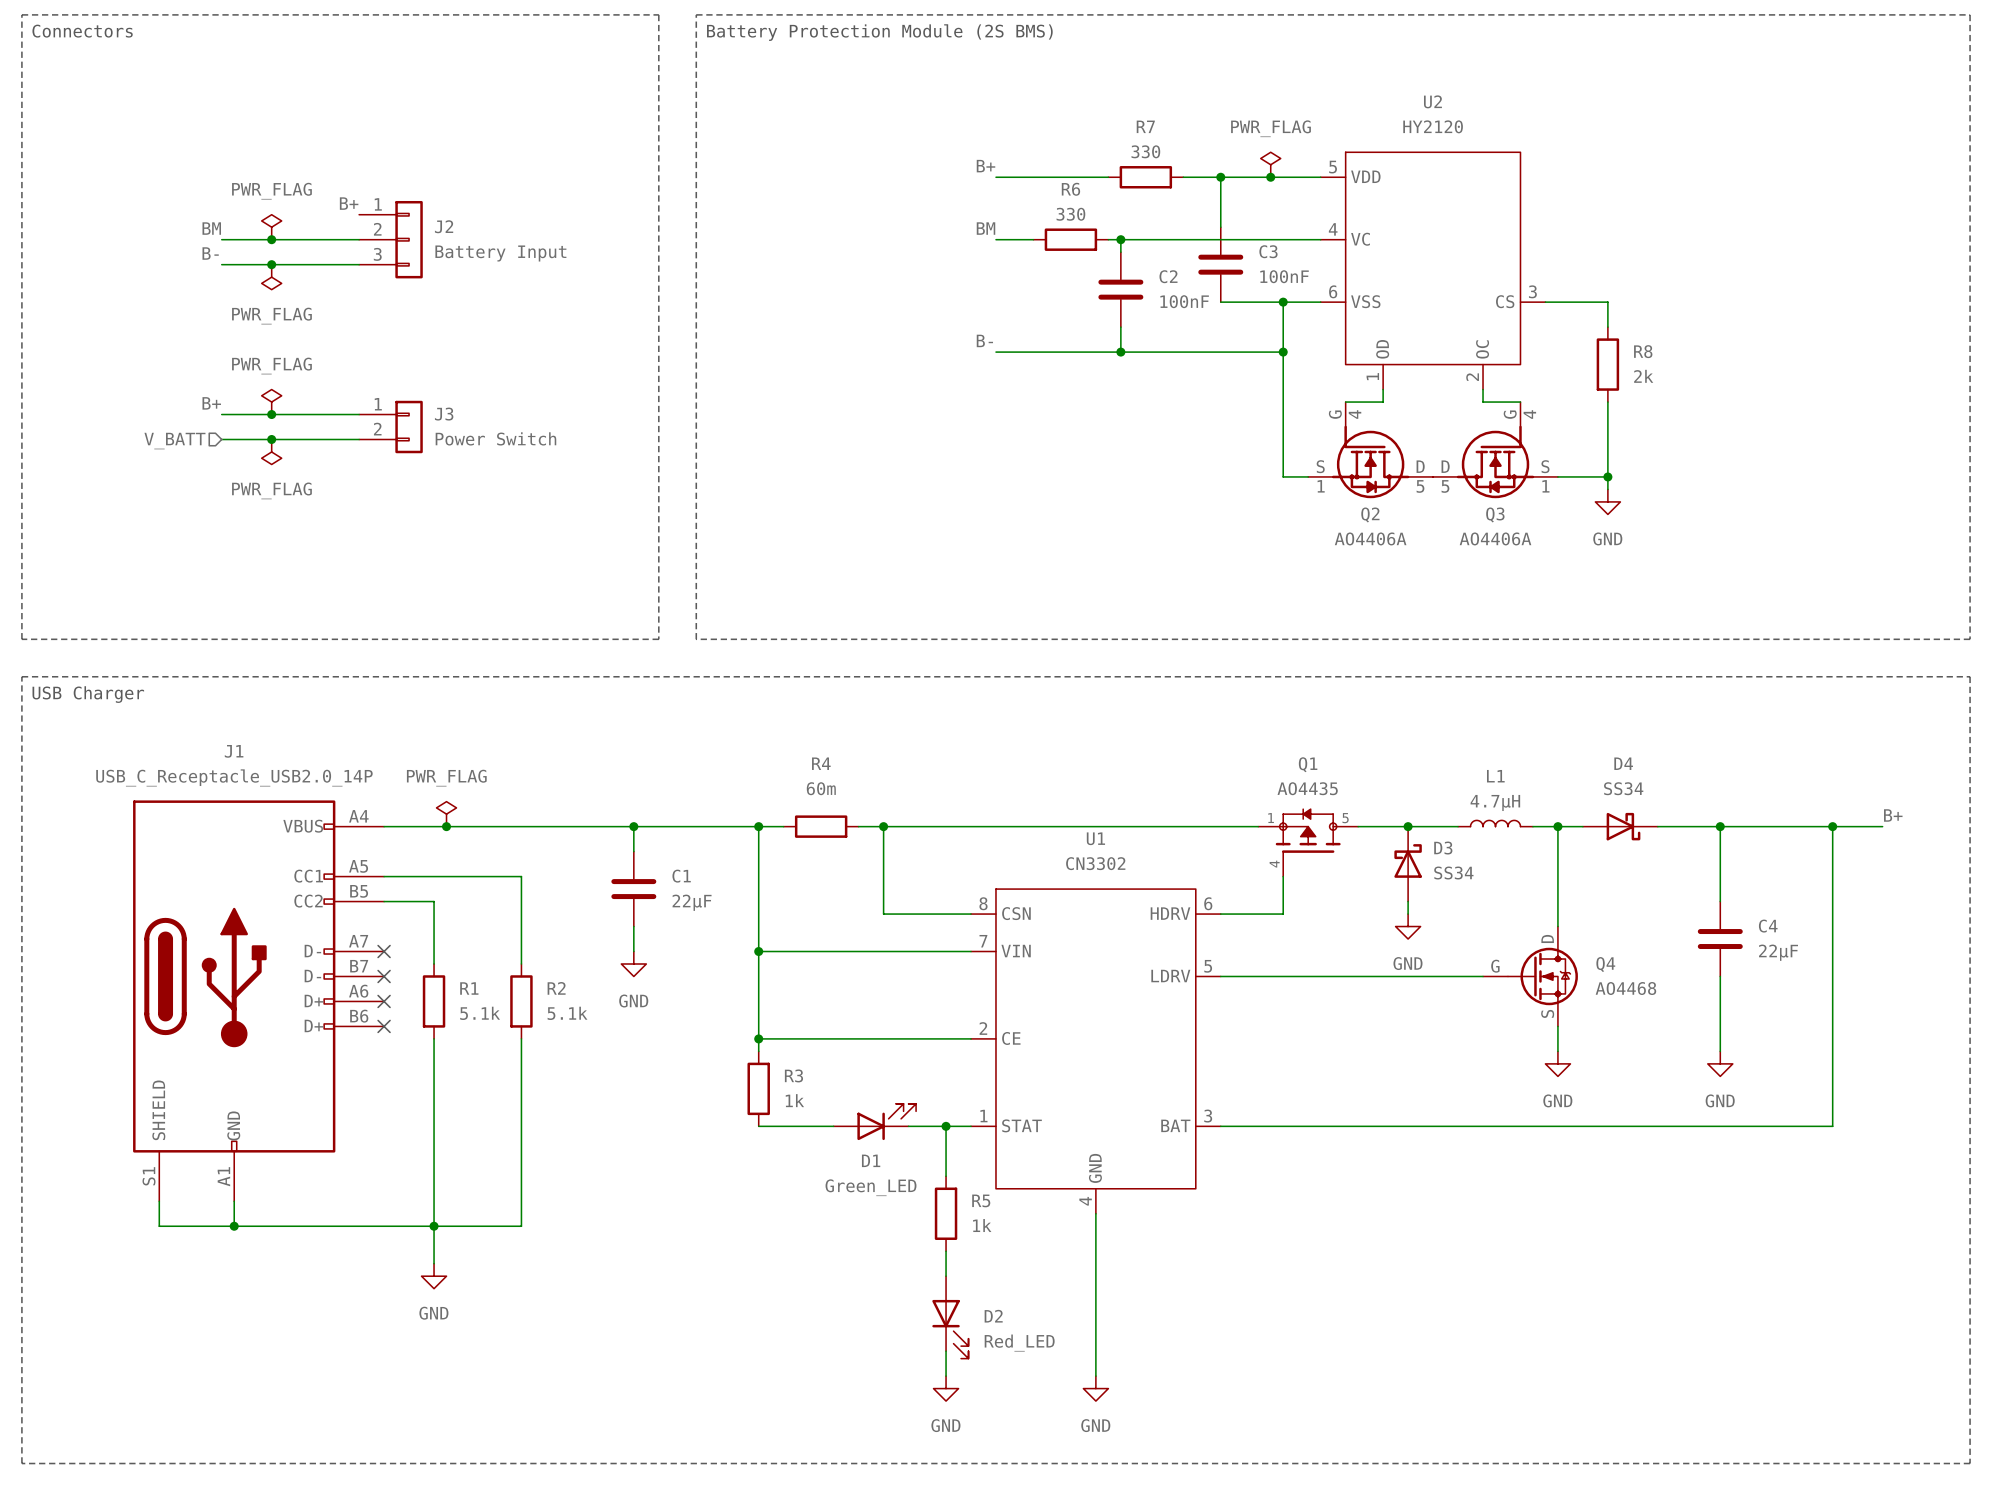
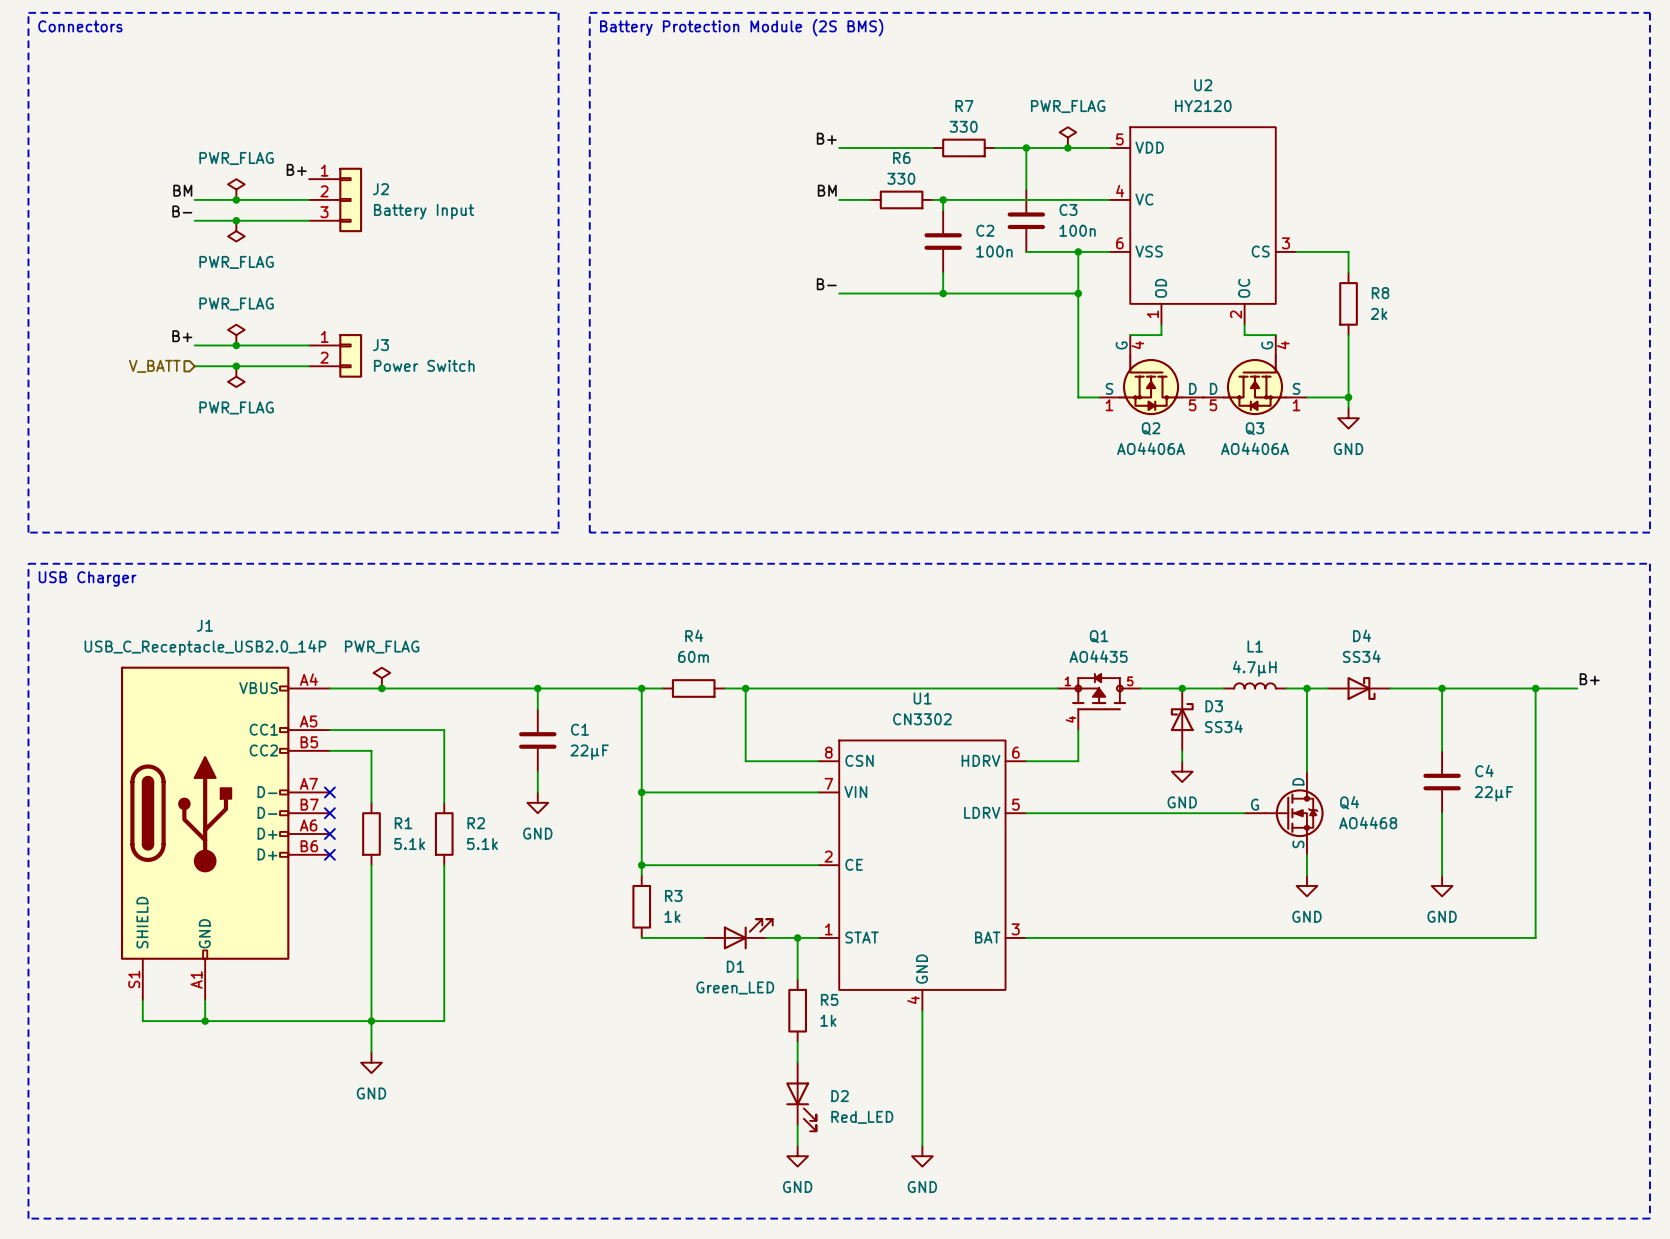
C3 value: 100nF (1284, 276) -> 100n (1077, 230)
C2 value: 100nF (1184, 301) -> 100n (994, 251)

